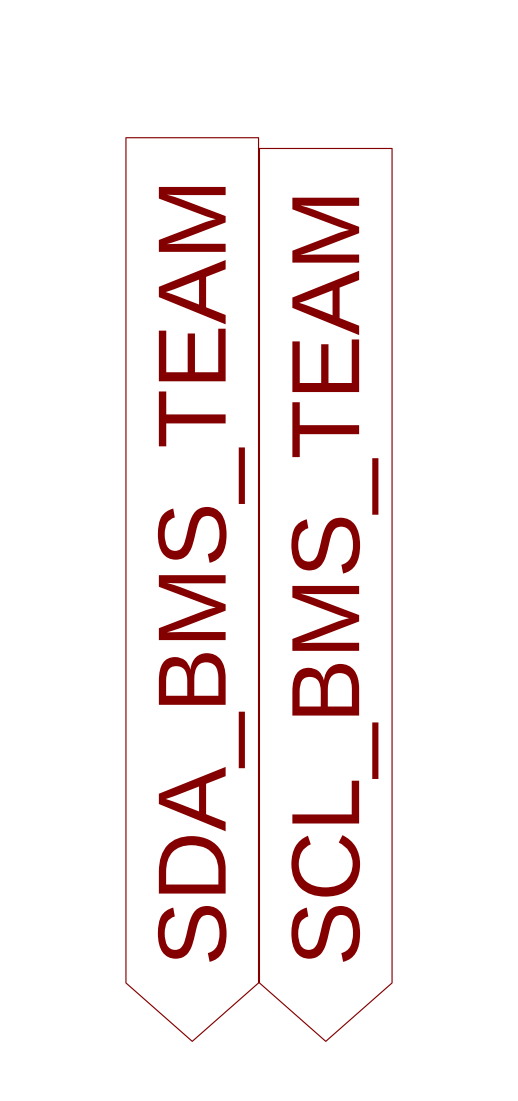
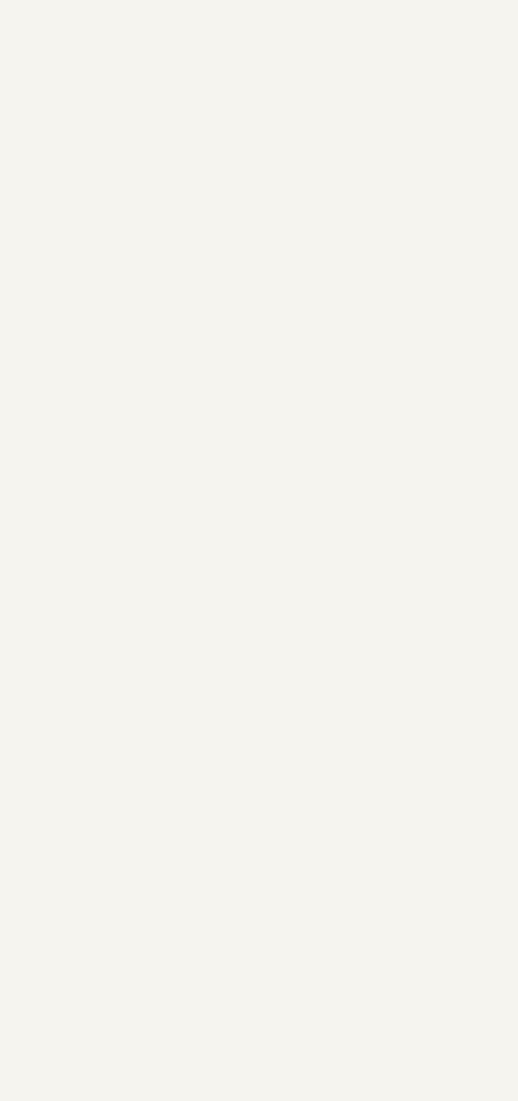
global label: SDA_BMS_TEAM (201, 574) -> none
global label: SCL_BMS_TEAM (334, 579) -> none

